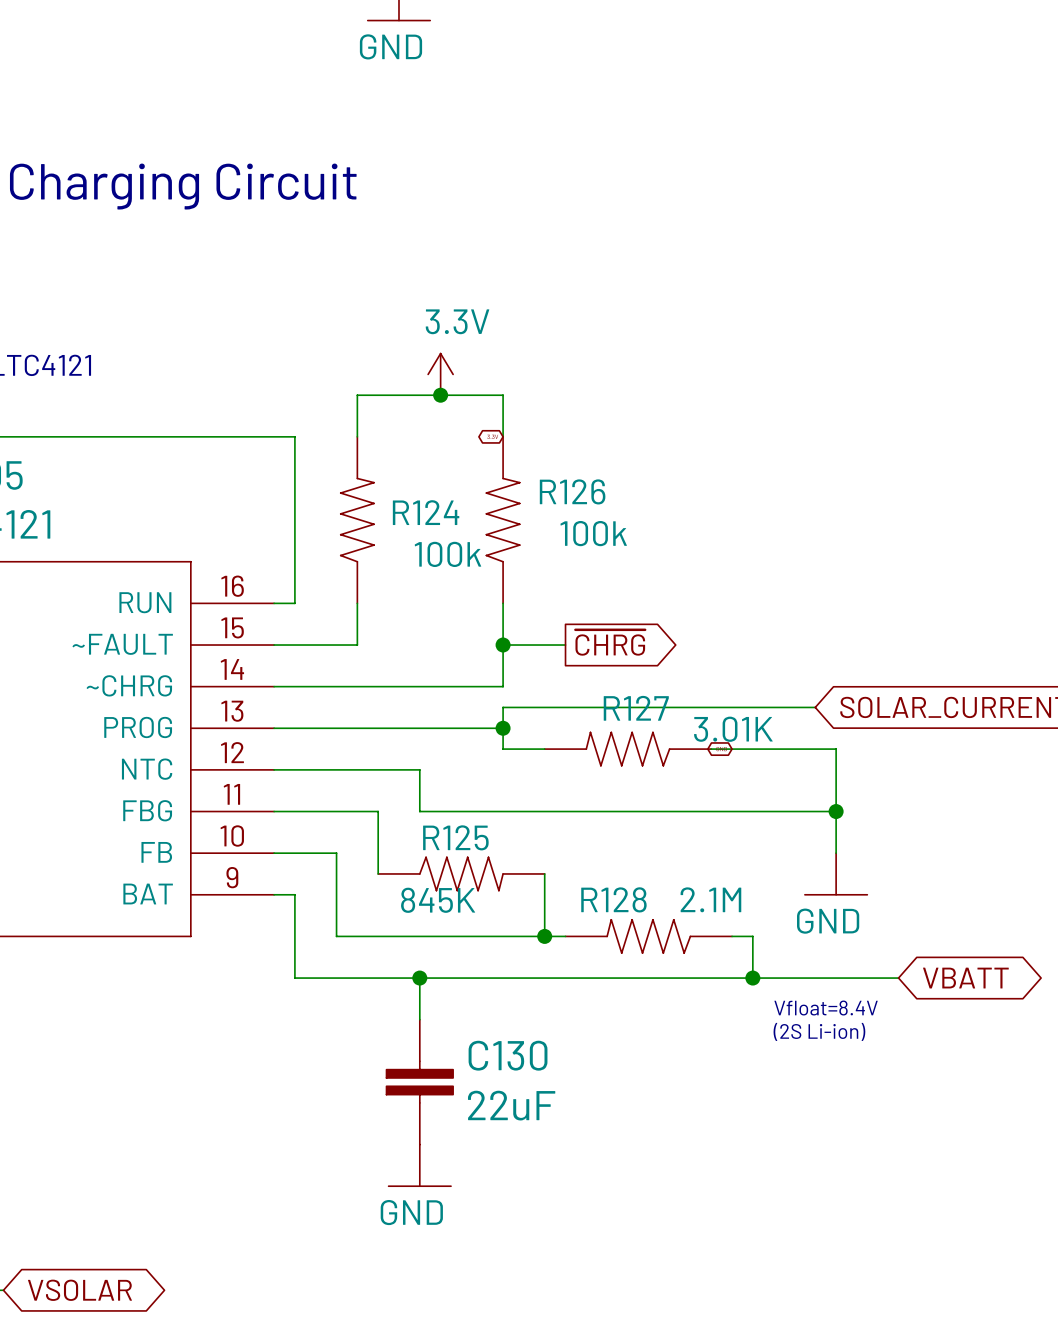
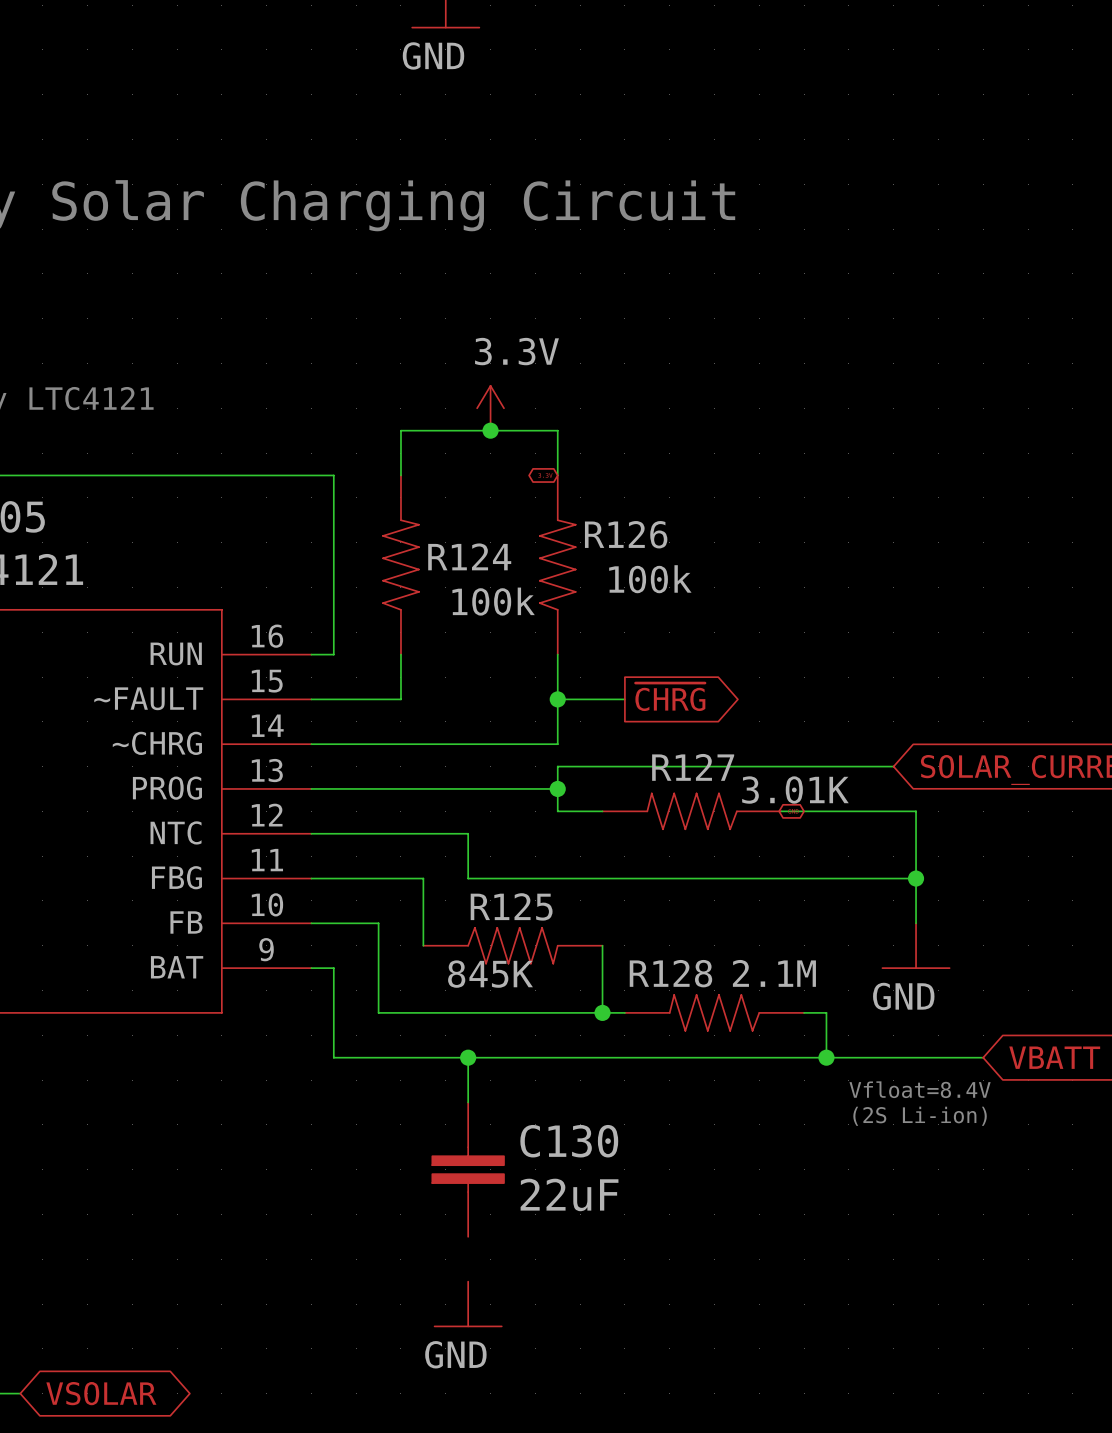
power symbol position: GND (419, 1165) -> GND (468, 1304)

